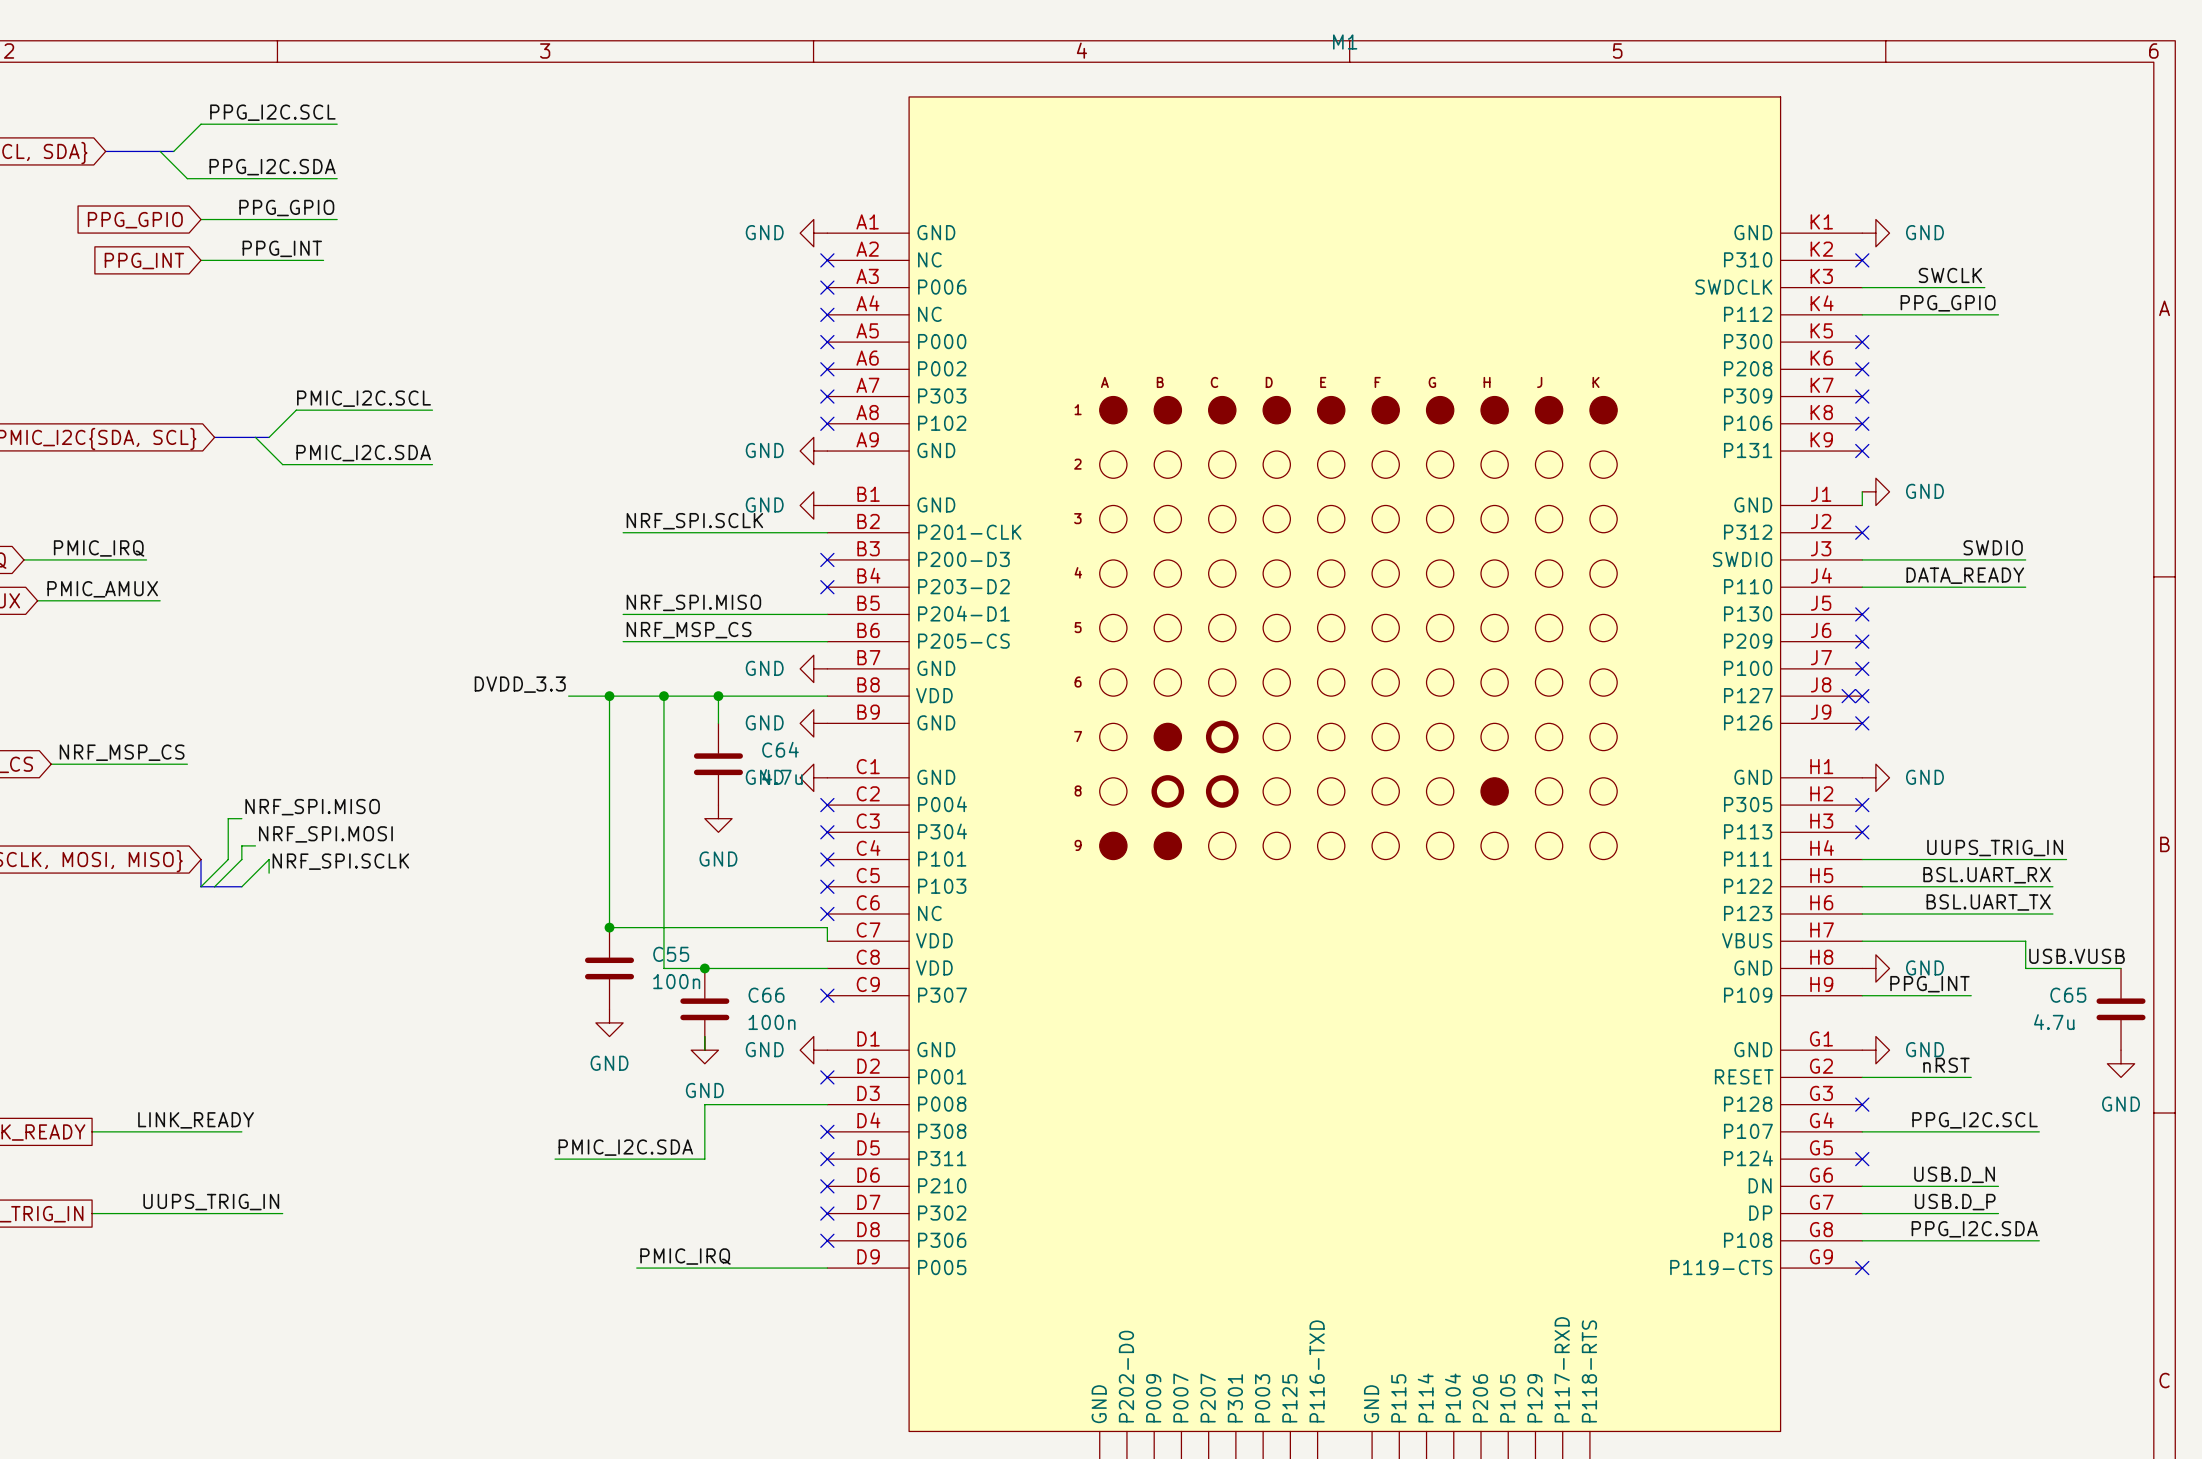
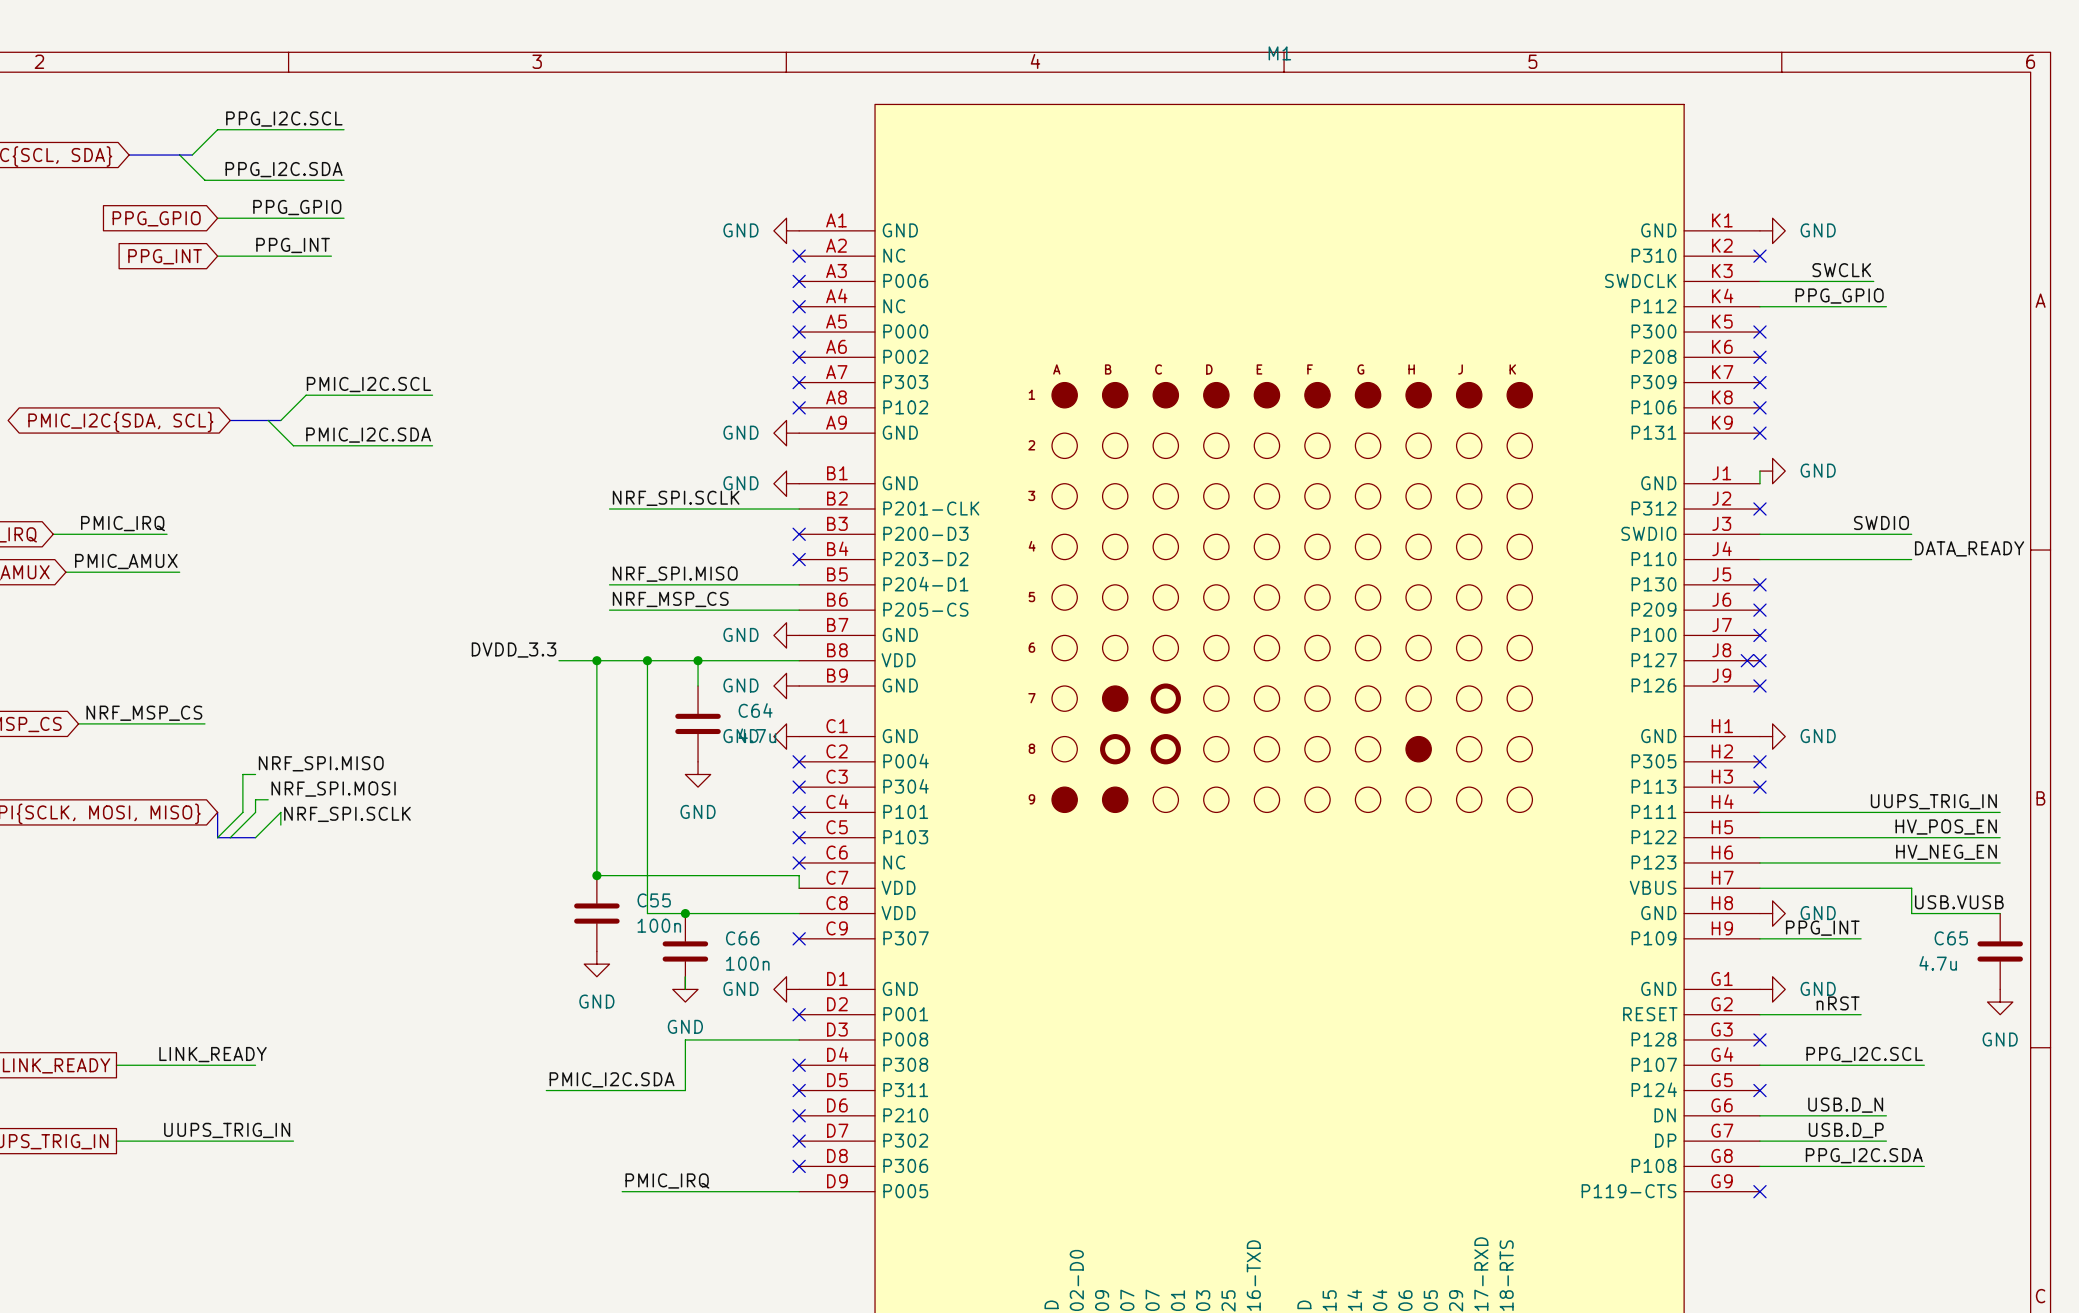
label position: DATA_READY (1965, 575) -> DATA_READY (1969, 548)
label position: UUPS_TRIG_IN (1995, 848) -> UUPS_TRIG_IN (1933, 801)
wire: none -> (1949, 812) (2000, 812)
label: BSL.UART_RX (1987, 875) -> none
label: none -> HV_POS_EN (1946, 827)
wire: none -> (1936, 837) (2000, 837)
label: BSL.UART_TX (1988, 902) -> none
label: none -> HV_NEG_EN (1946, 852)
wire: none -> (1936, 862) (2000, 862)

